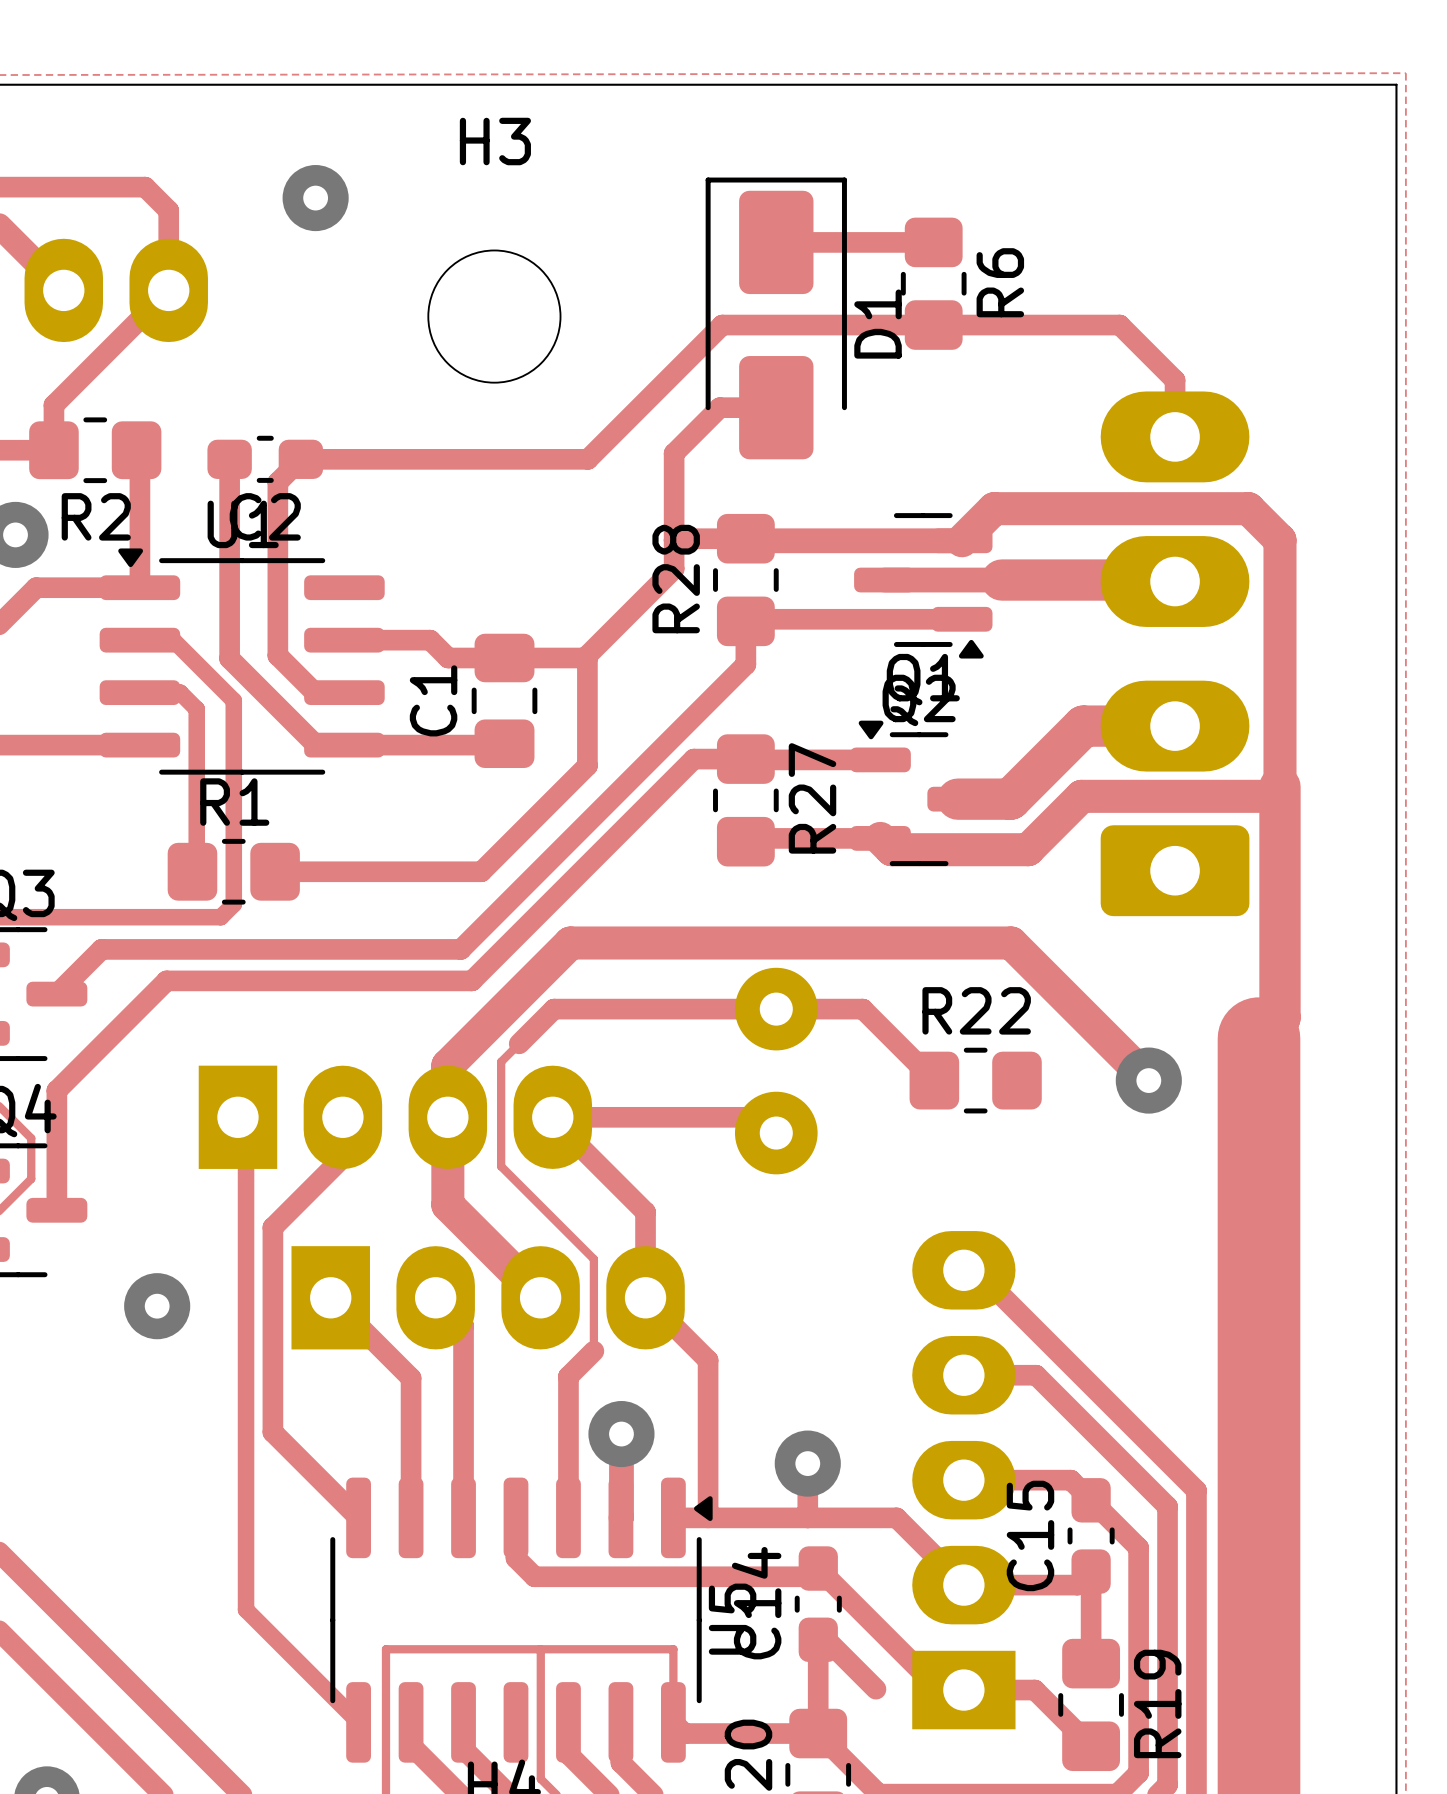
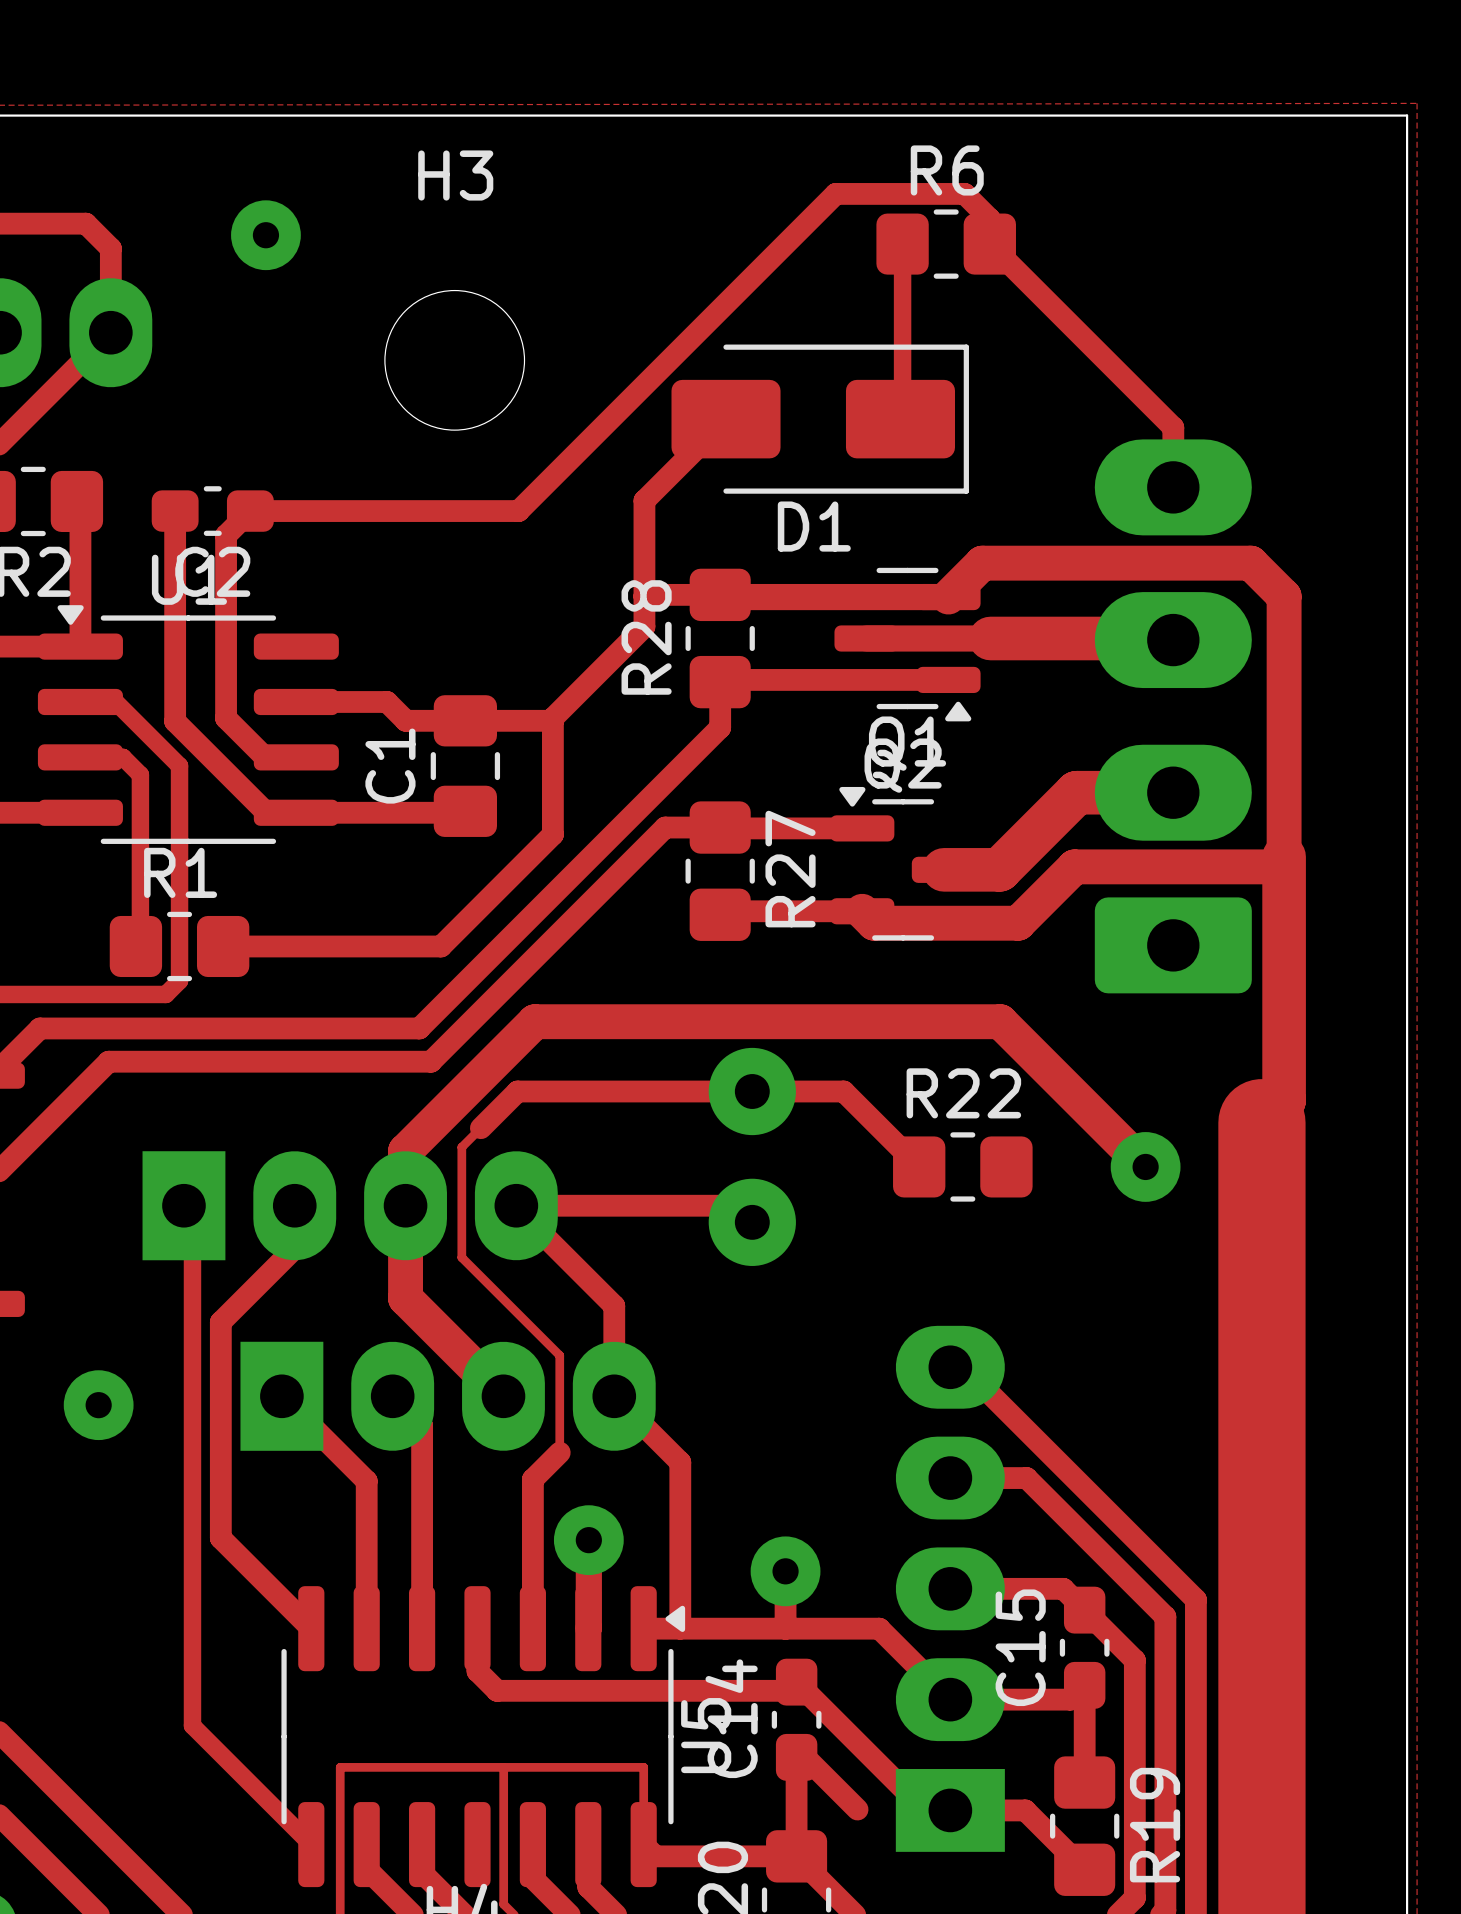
track: none -> (902, 244) (902, 417)
track: (776, 242) (933, 242) -> none
R6 name position: R6 (1000, 282) -> R6 (947, 170)
R6 rotation: 0° (933, 283) -> 90° clockwise (946, 244)
R6 position: (933, 283) -> (946, 244)
D1 rotation: 0° (776, 318) -> 90° clockwise (820, 419)
track: (1119, 325) (722, 325) (587, 459) (554, 459) -> (1115, 369) (989, 244) (989, 219) (964, 193) (835, 193) (518, 511)
track: (776, 407) (719, 407) (674, 453) -> (726, 419) (644, 500) (644, 504)

